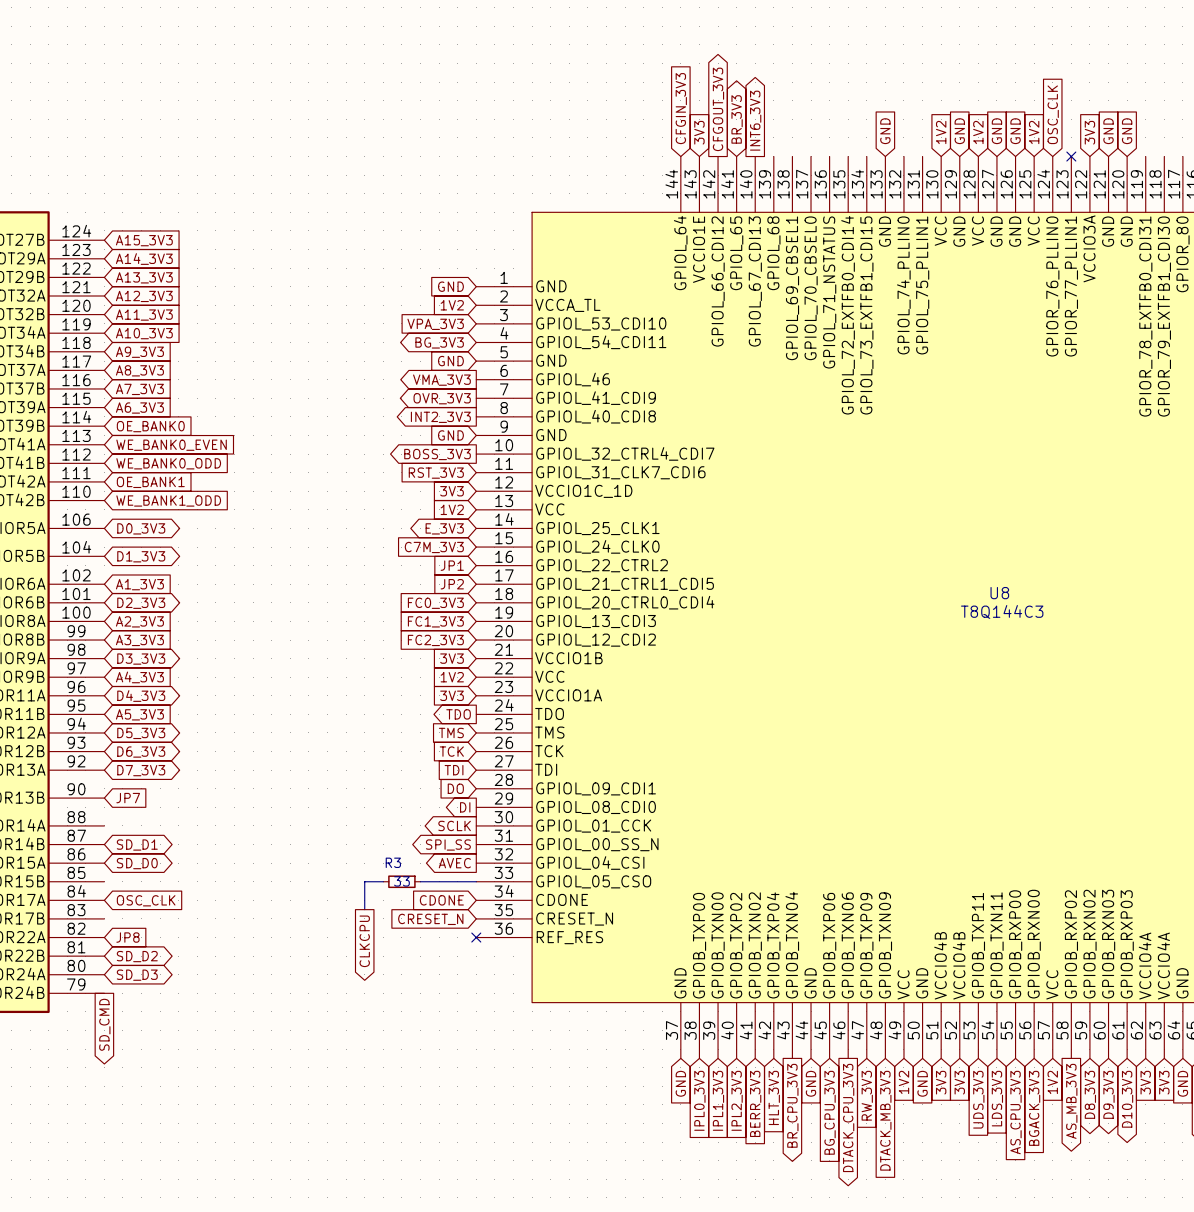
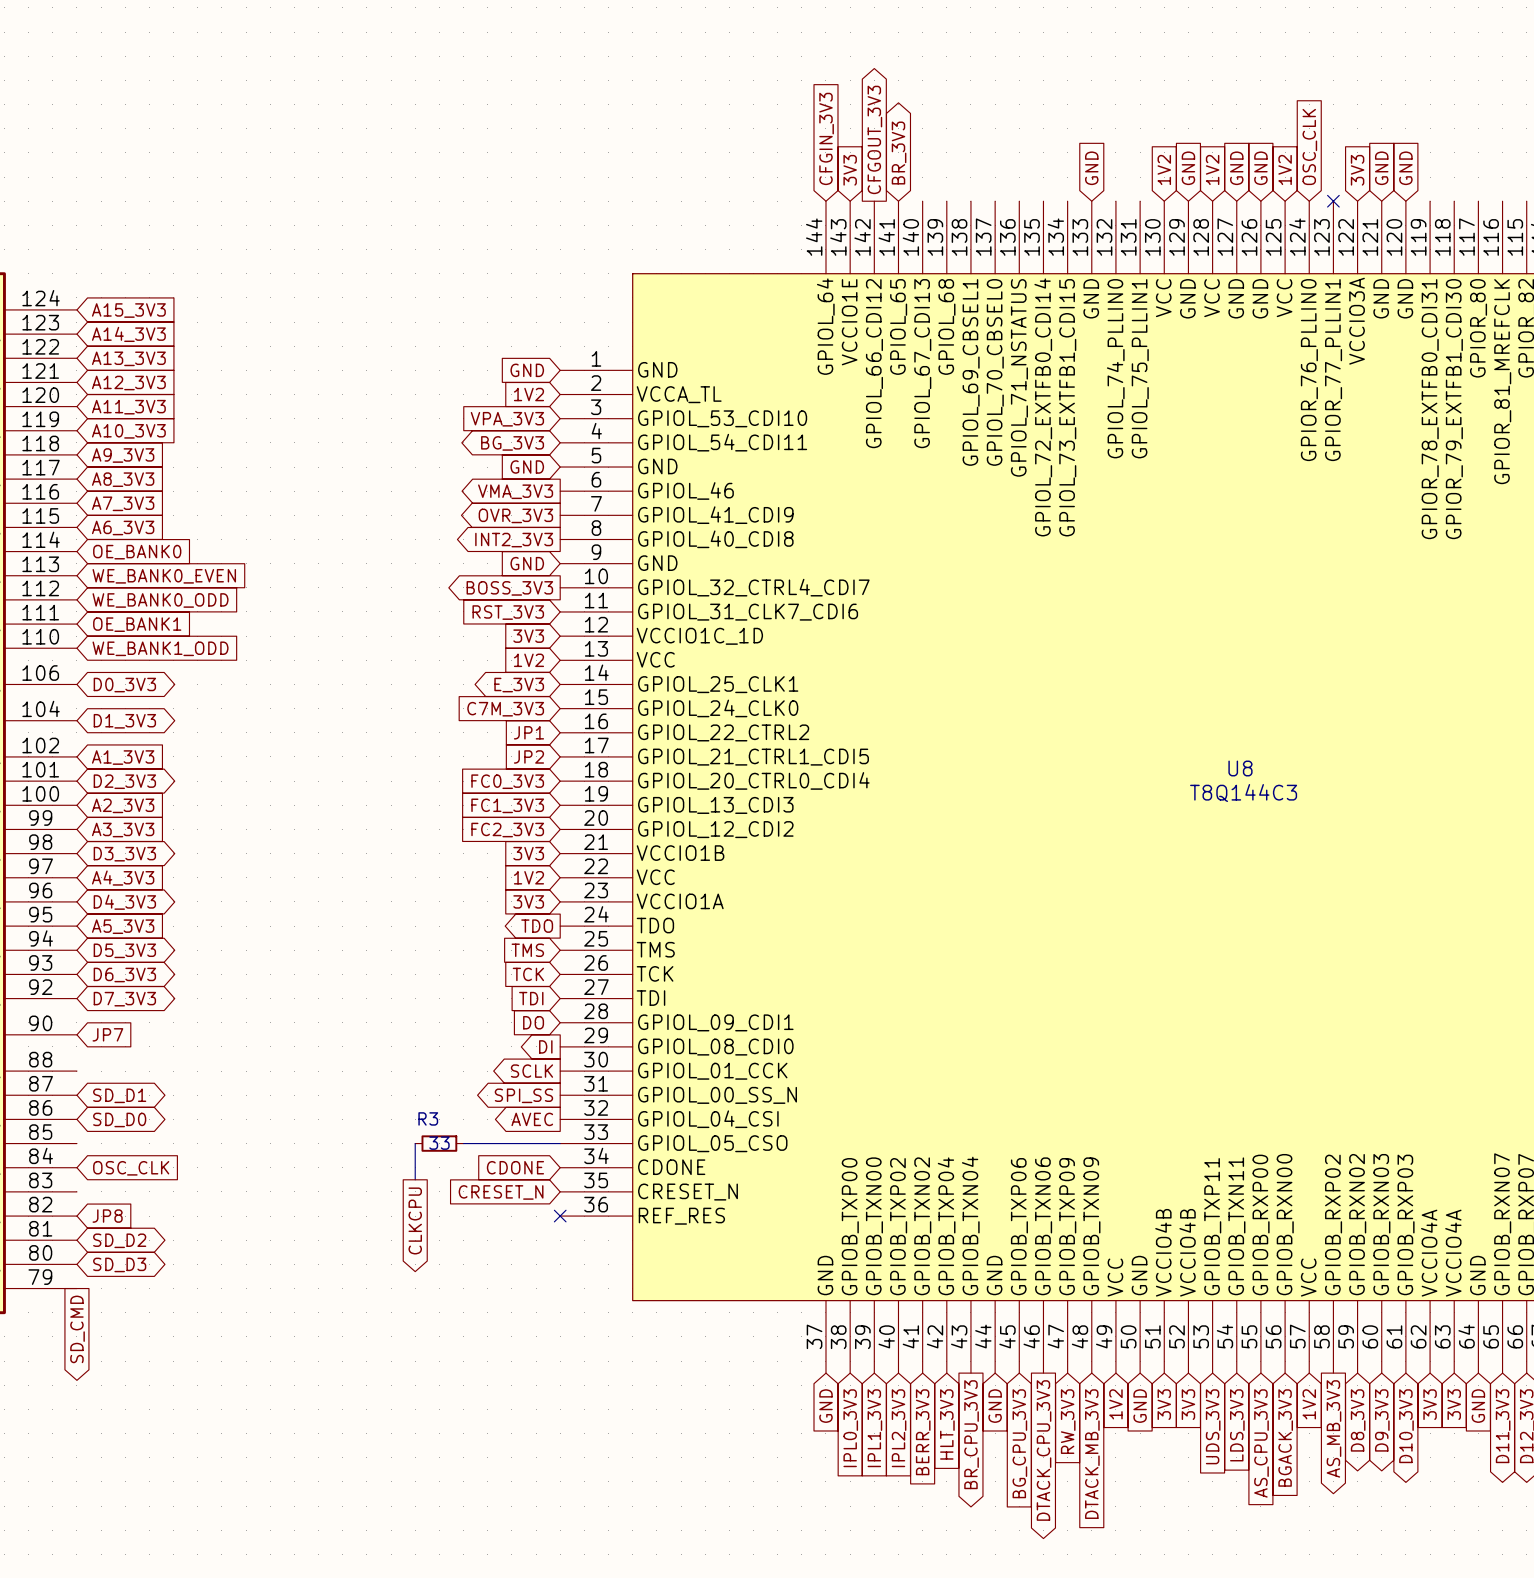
global label: INT6_3V3 (755, 120) -> none
wire: (364, 881) (383, 881) -> (463, 1143) (487, 1143)
R3 position: (401, 881) -> (439, 1143)

